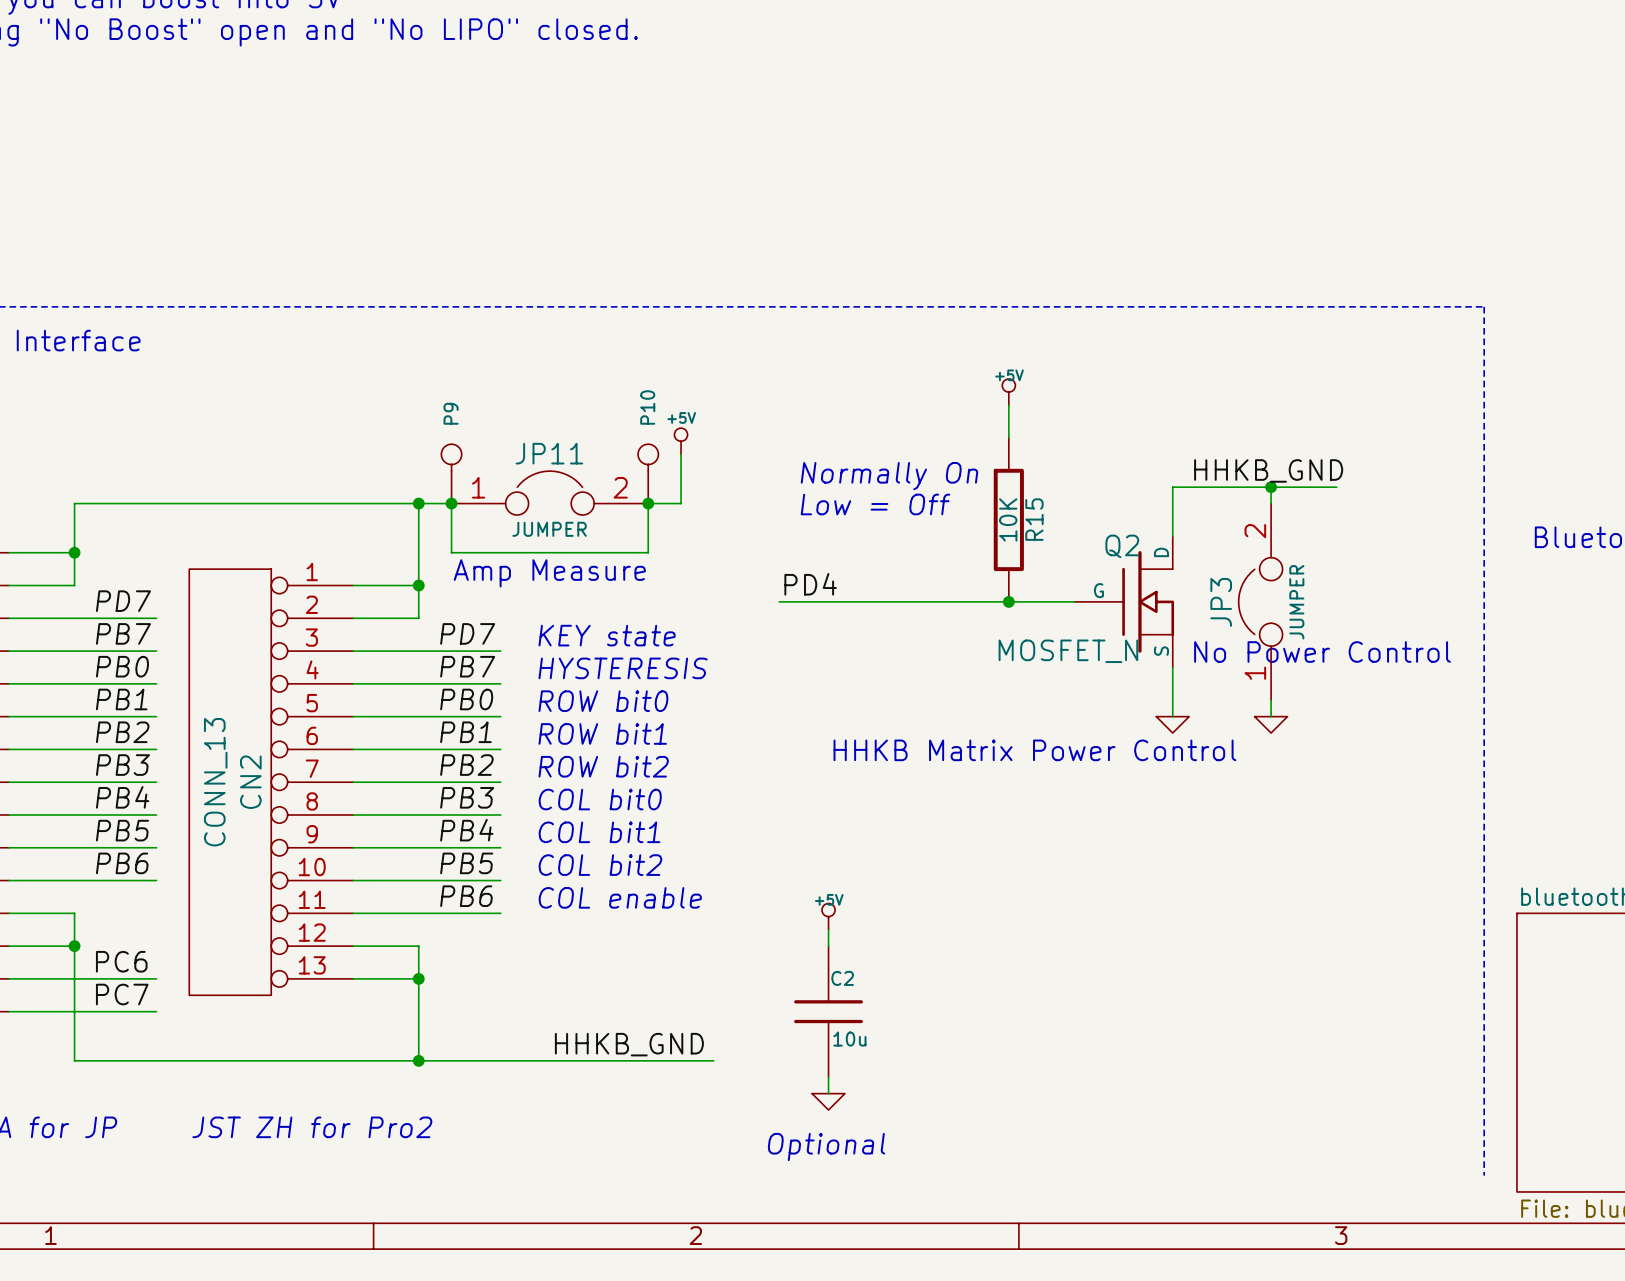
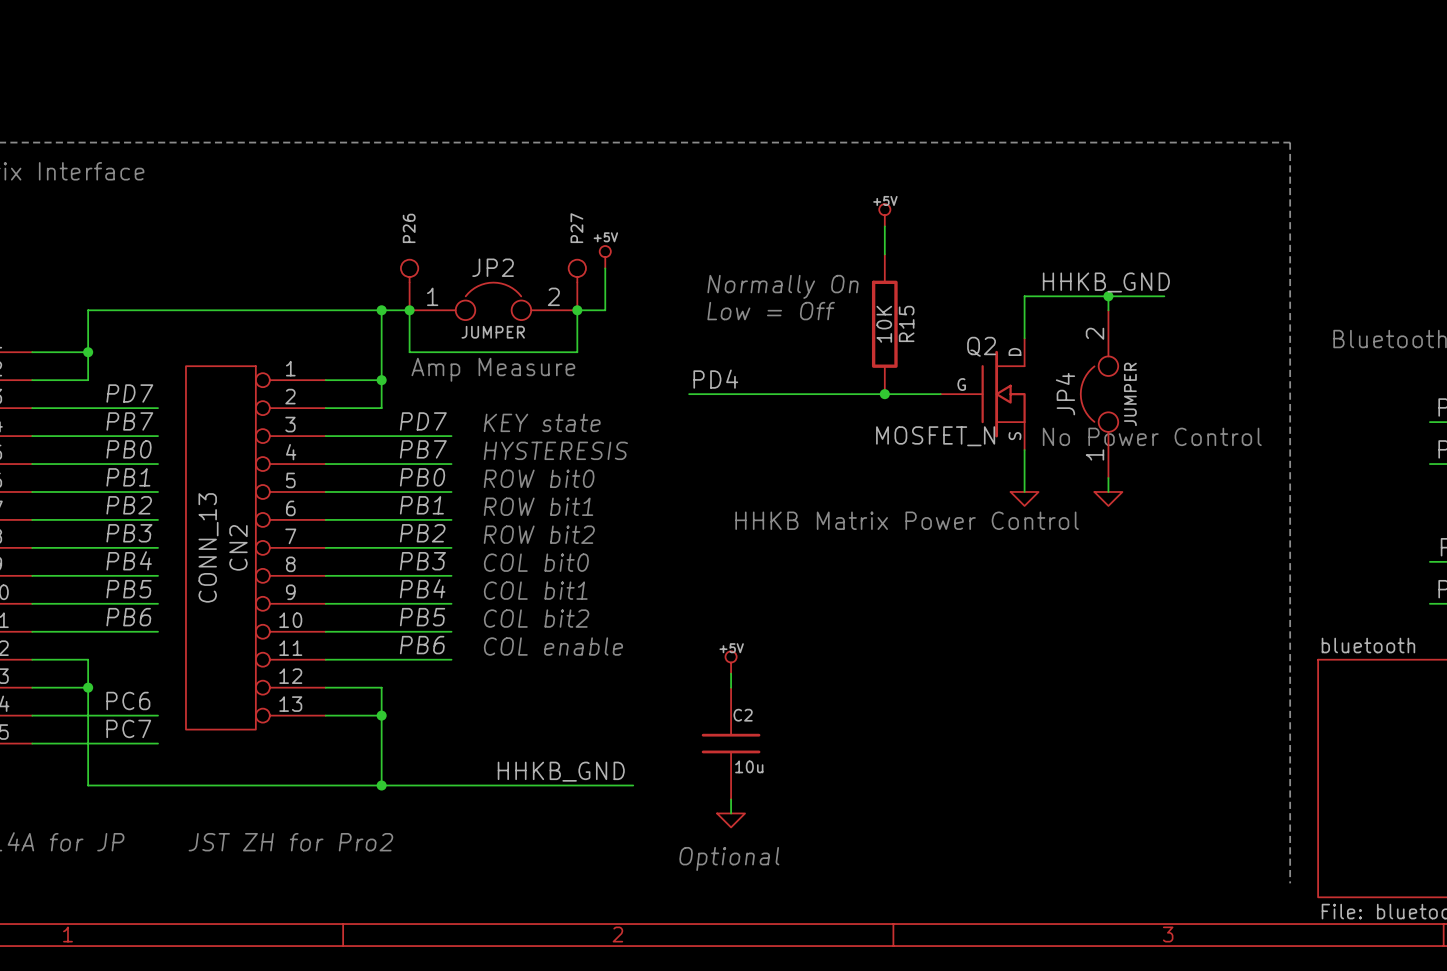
P10 name: P10 (647, 407) -> P27 (576, 228)
P9 name: P9 (451, 413) -> P26 (409, 228)
JP11 name: JP11 (549, 453) -> JP2 (493, 267)
JP3 name: JP3 (1221, 602) -> JP4 (1065, 394)

